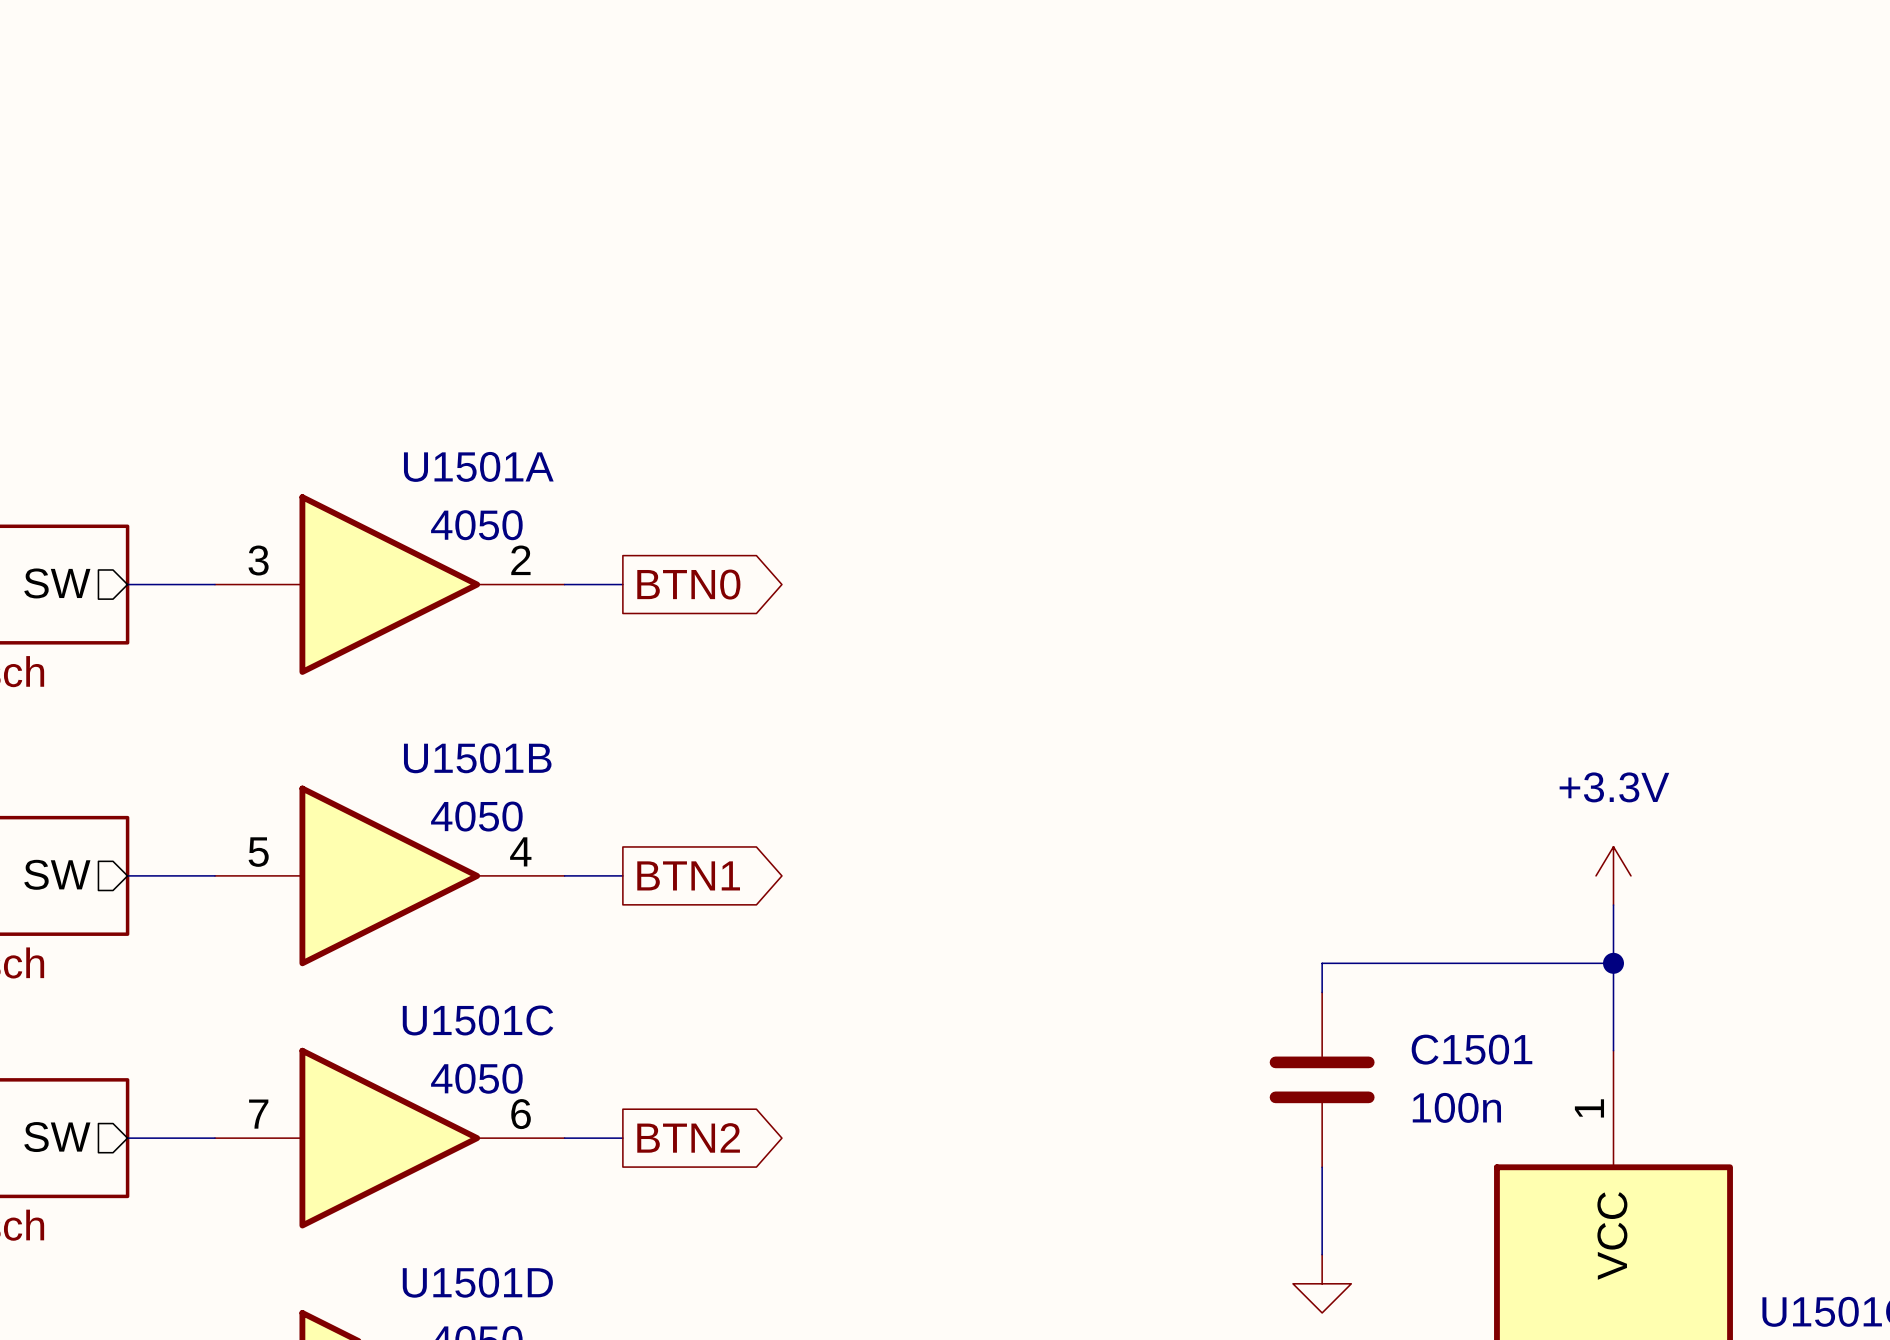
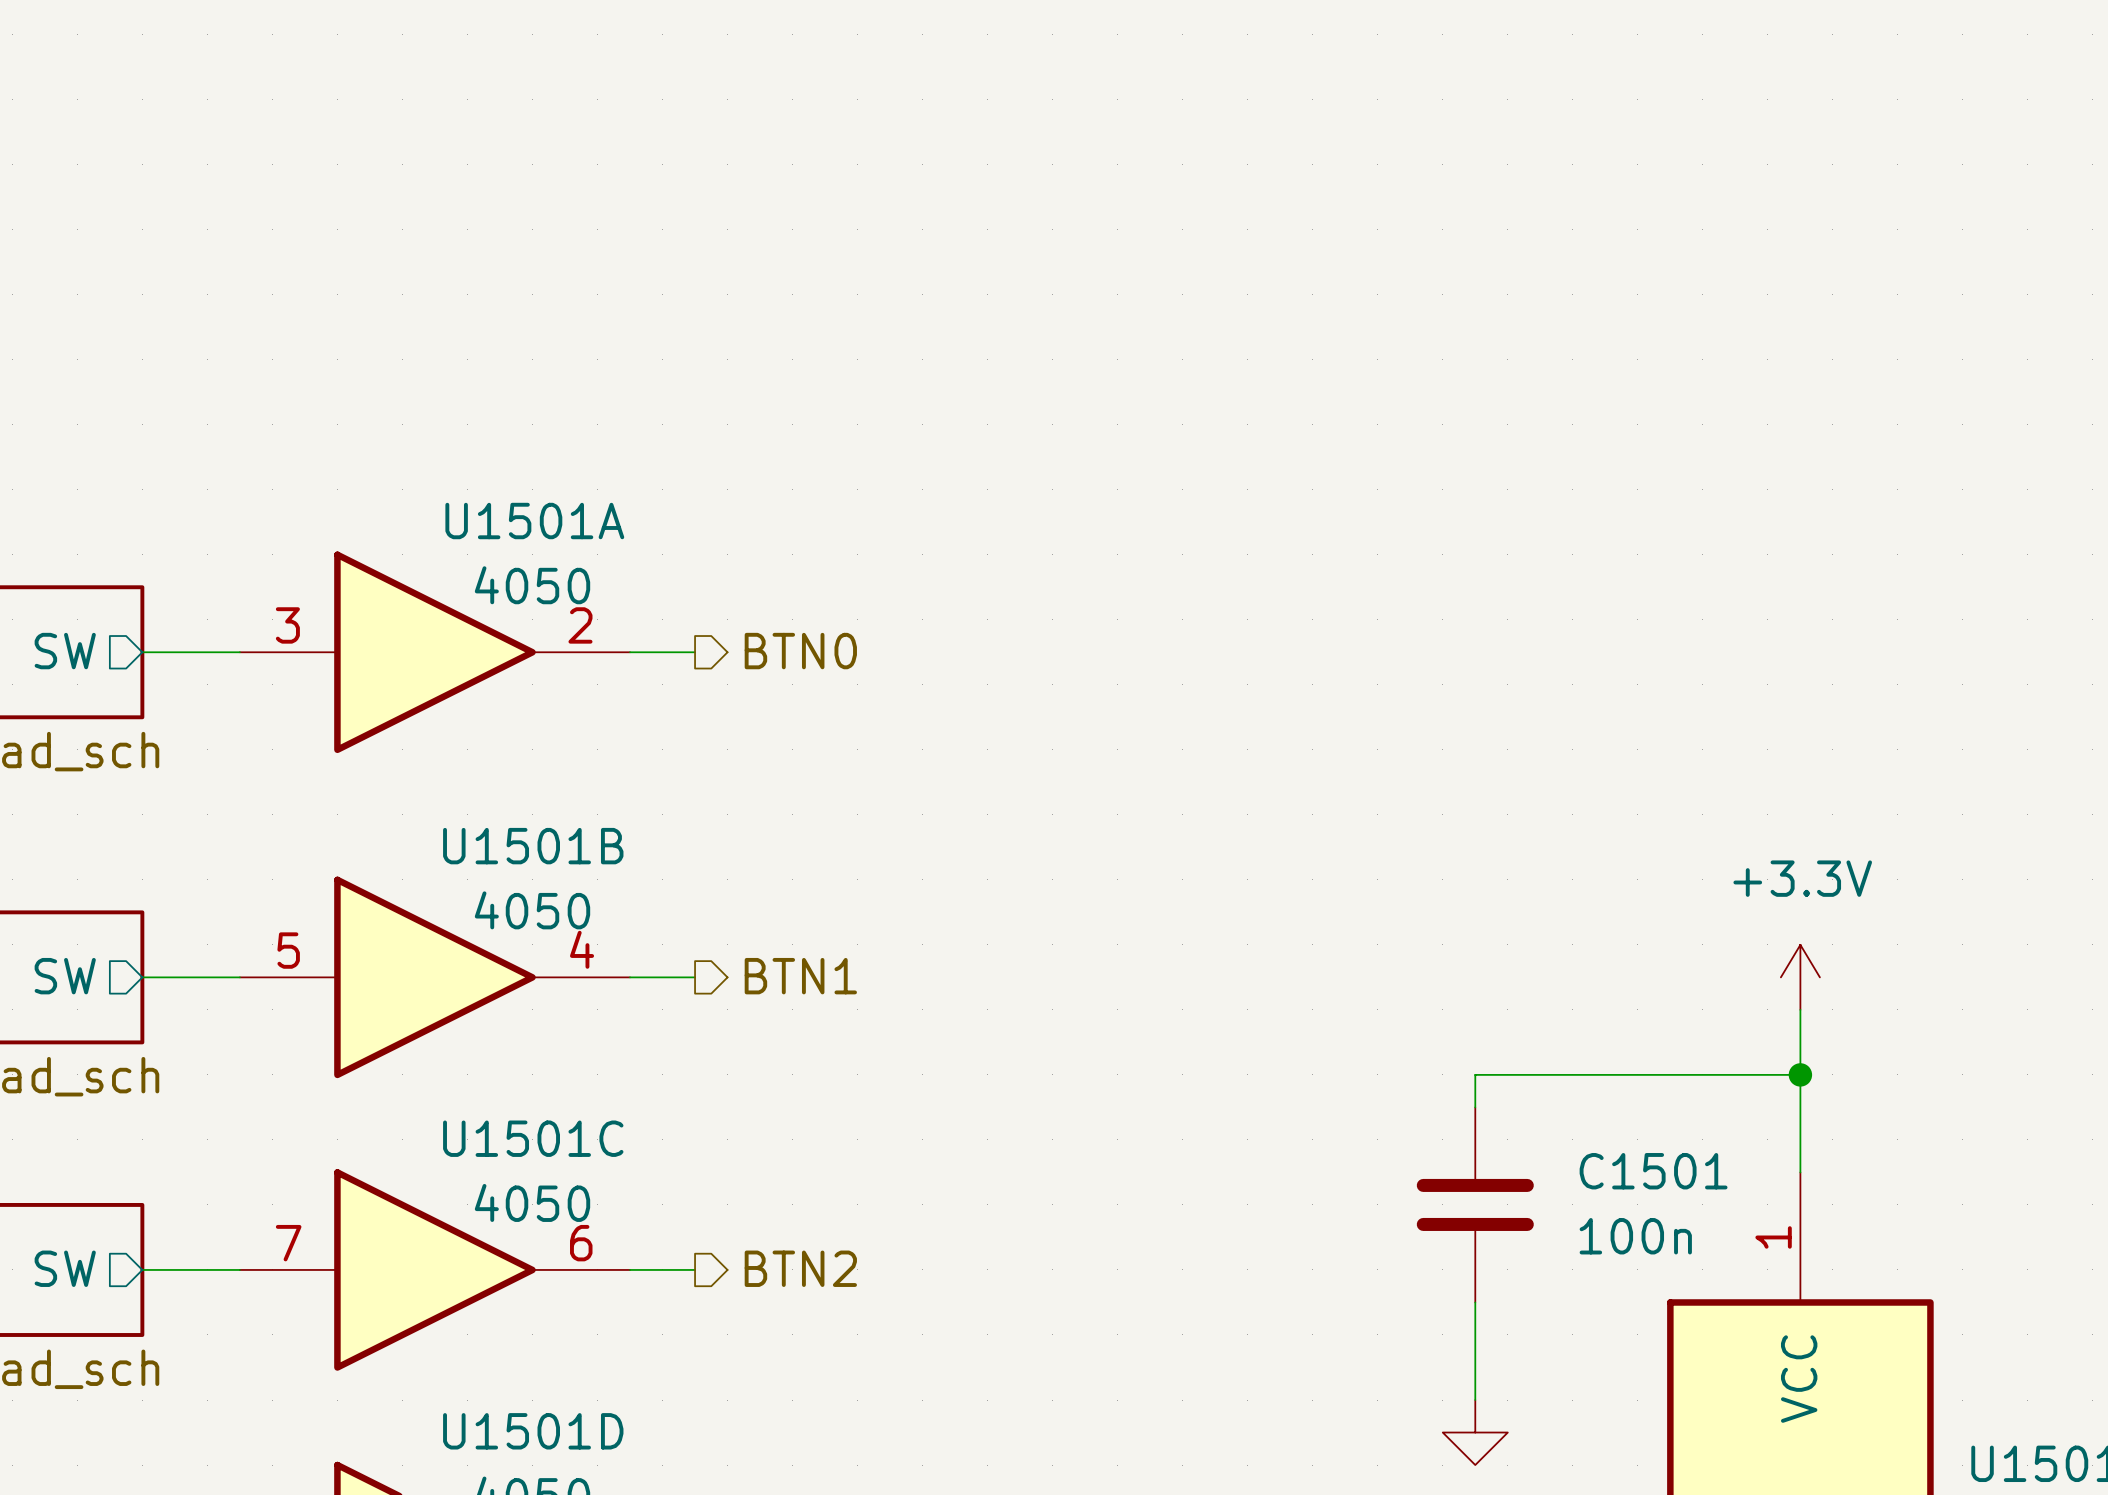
hierarchical label: none -> BTN0 (800, 651)
global label: BTN0 (688, 584) -> none
hierarchical label: none -> BTN1 (800, 976)
global label: BTN1 (688, 875) -> none
hierarchical label: none -> BTN2 (800, 1268)
global label: BTN2 (688, 1137) -> none

